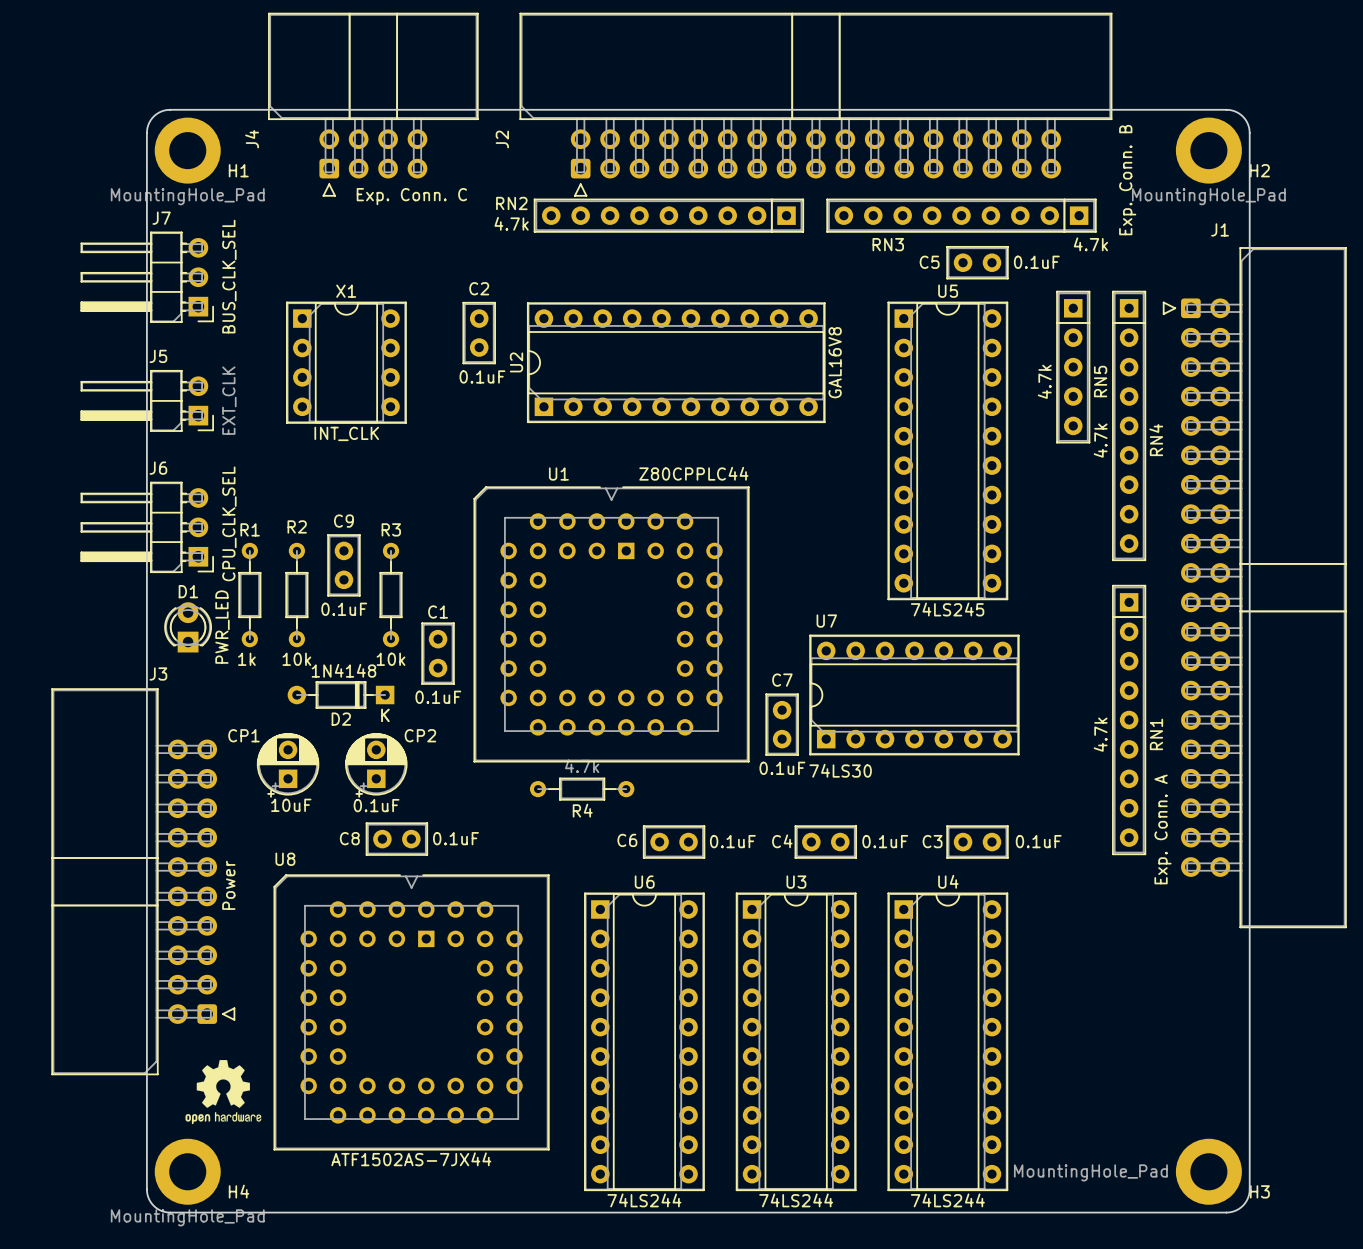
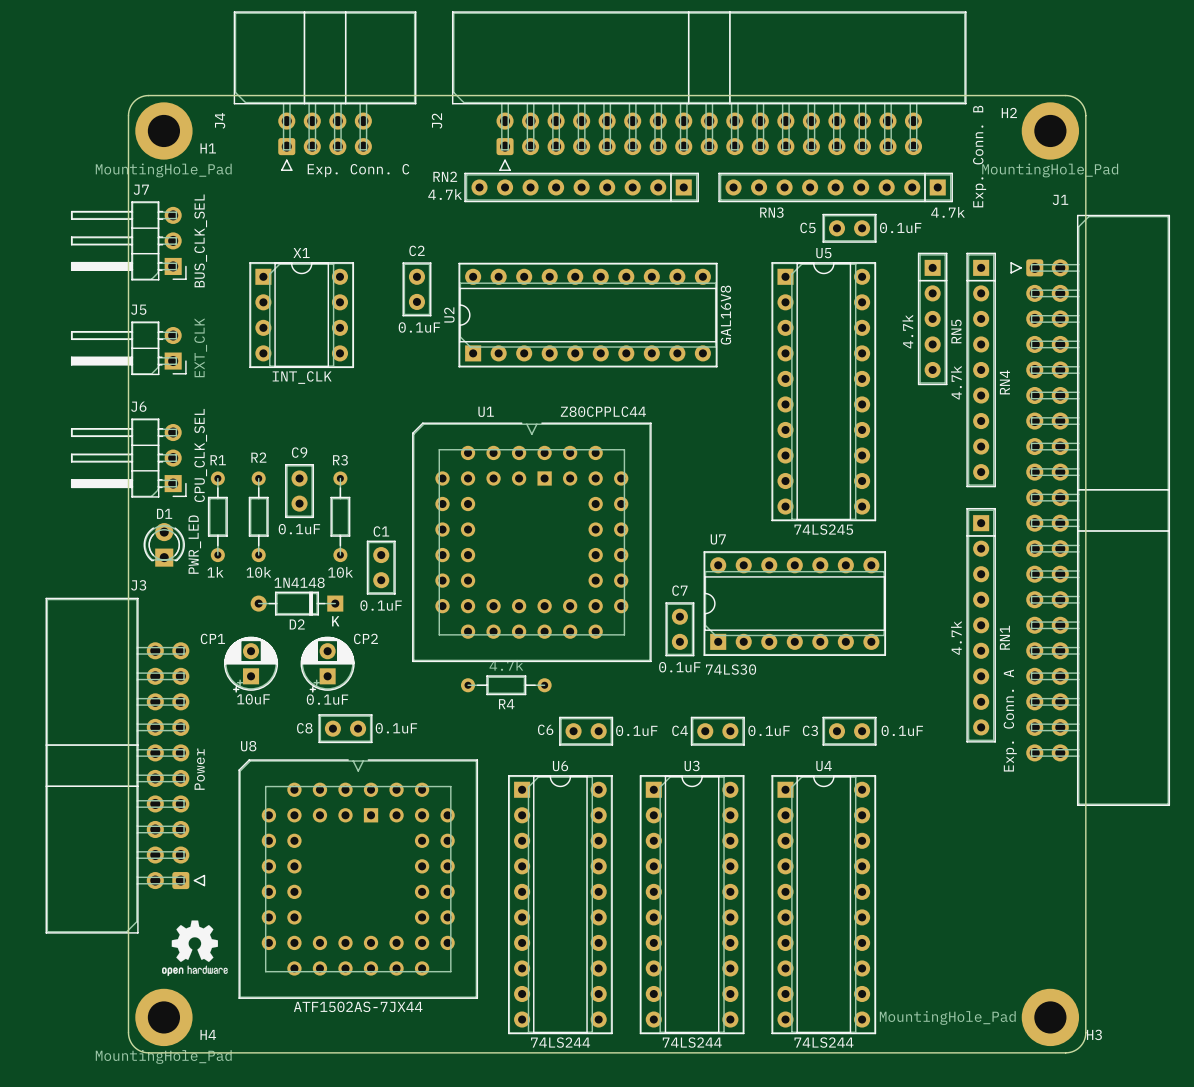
H2 name position: H2 (1259, 170) -> H2 (1009, 112)

